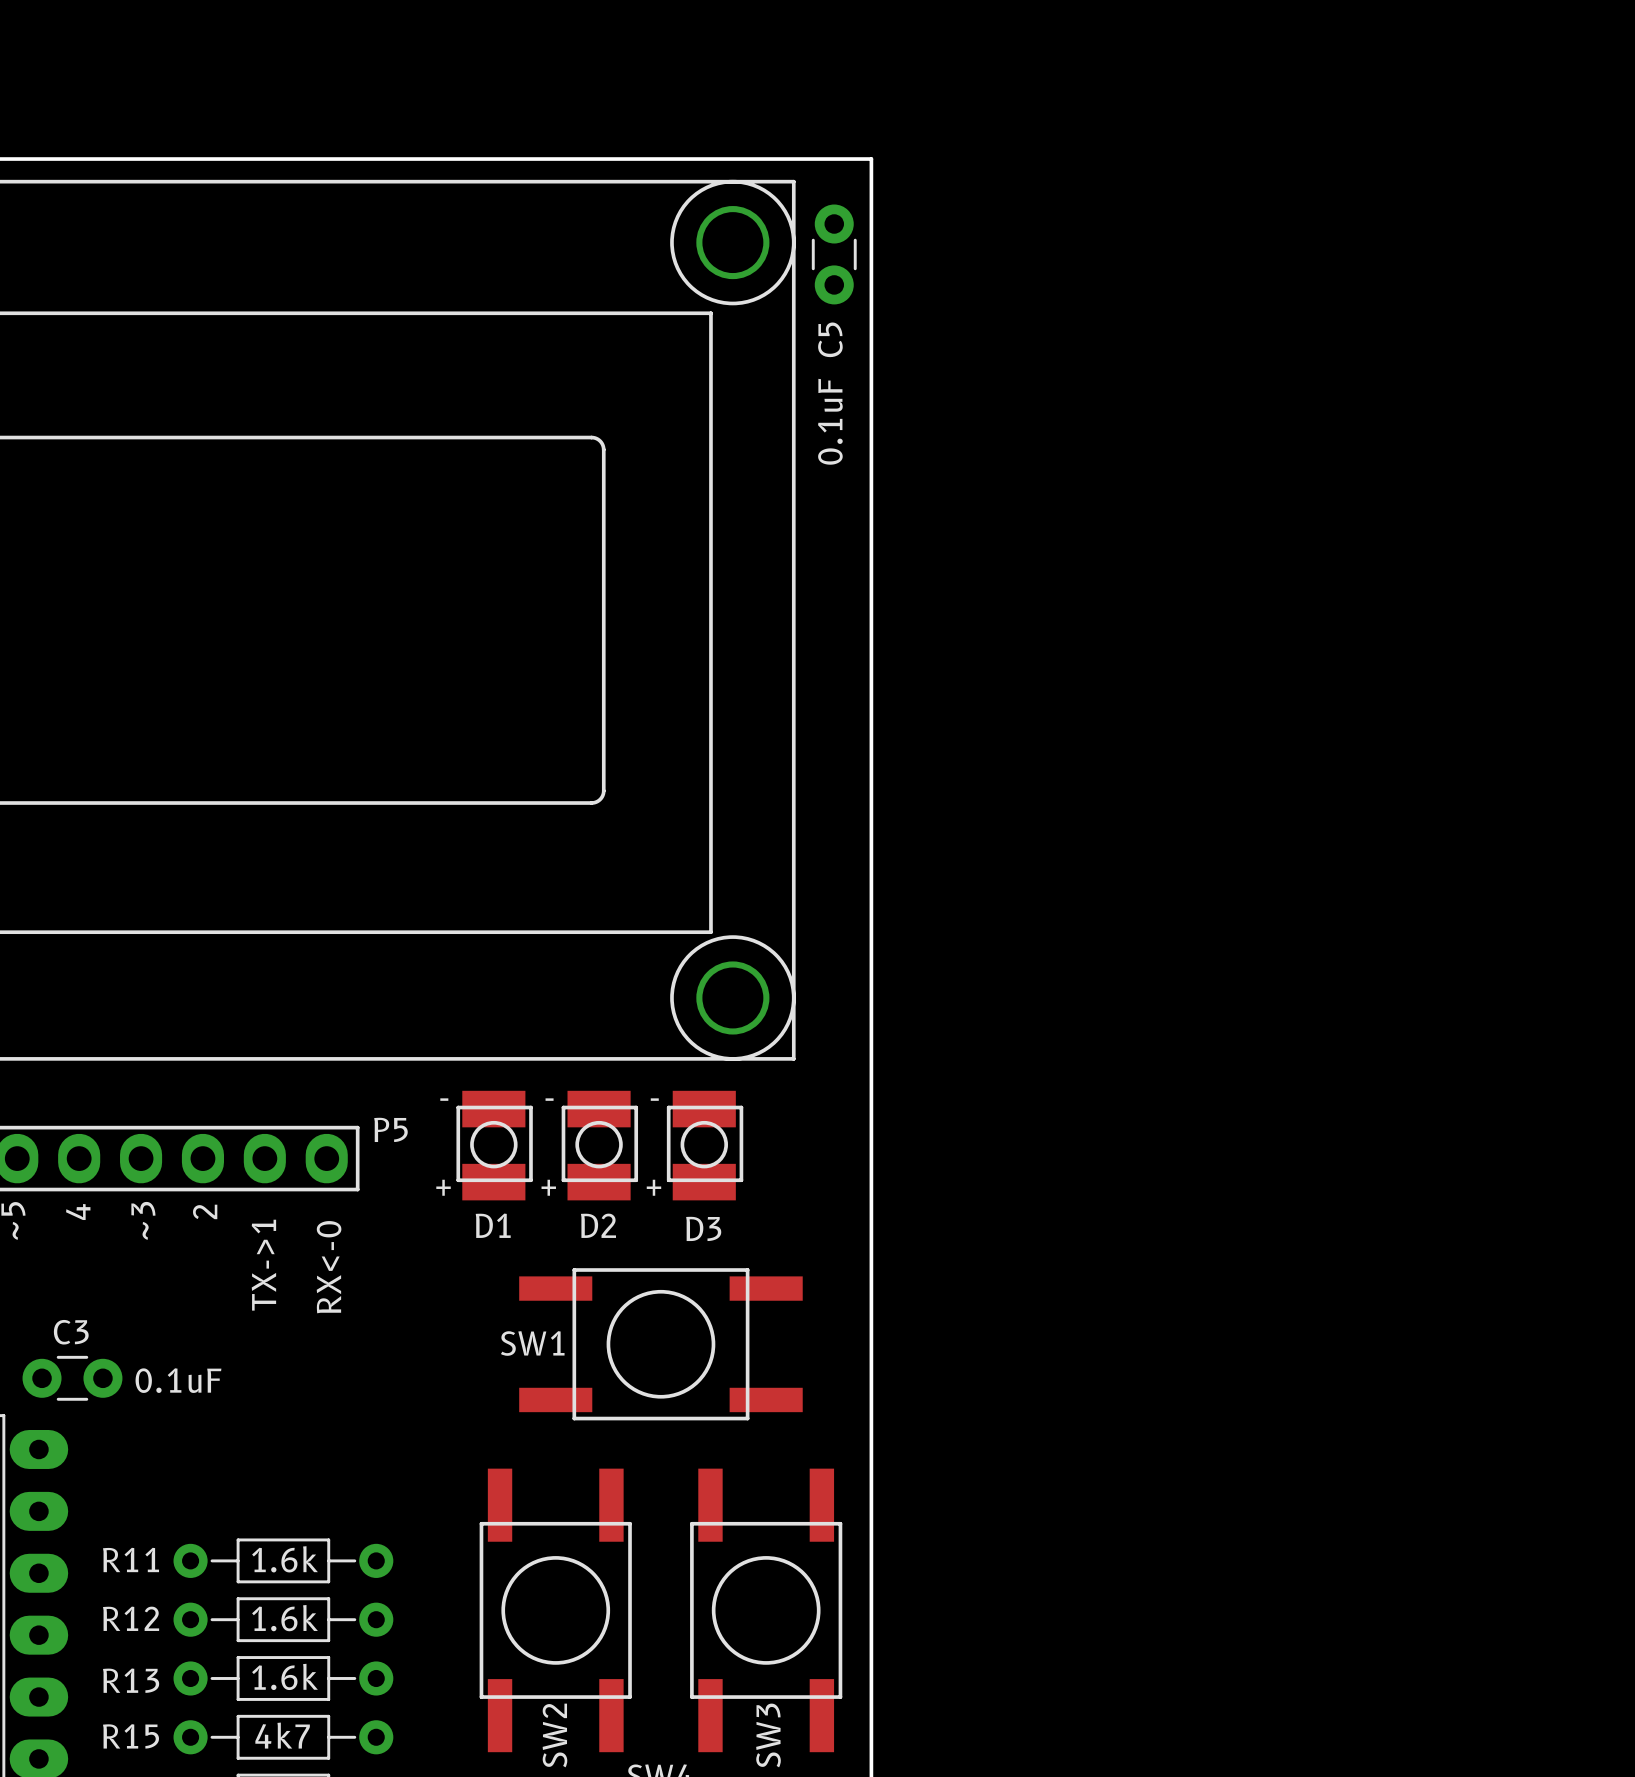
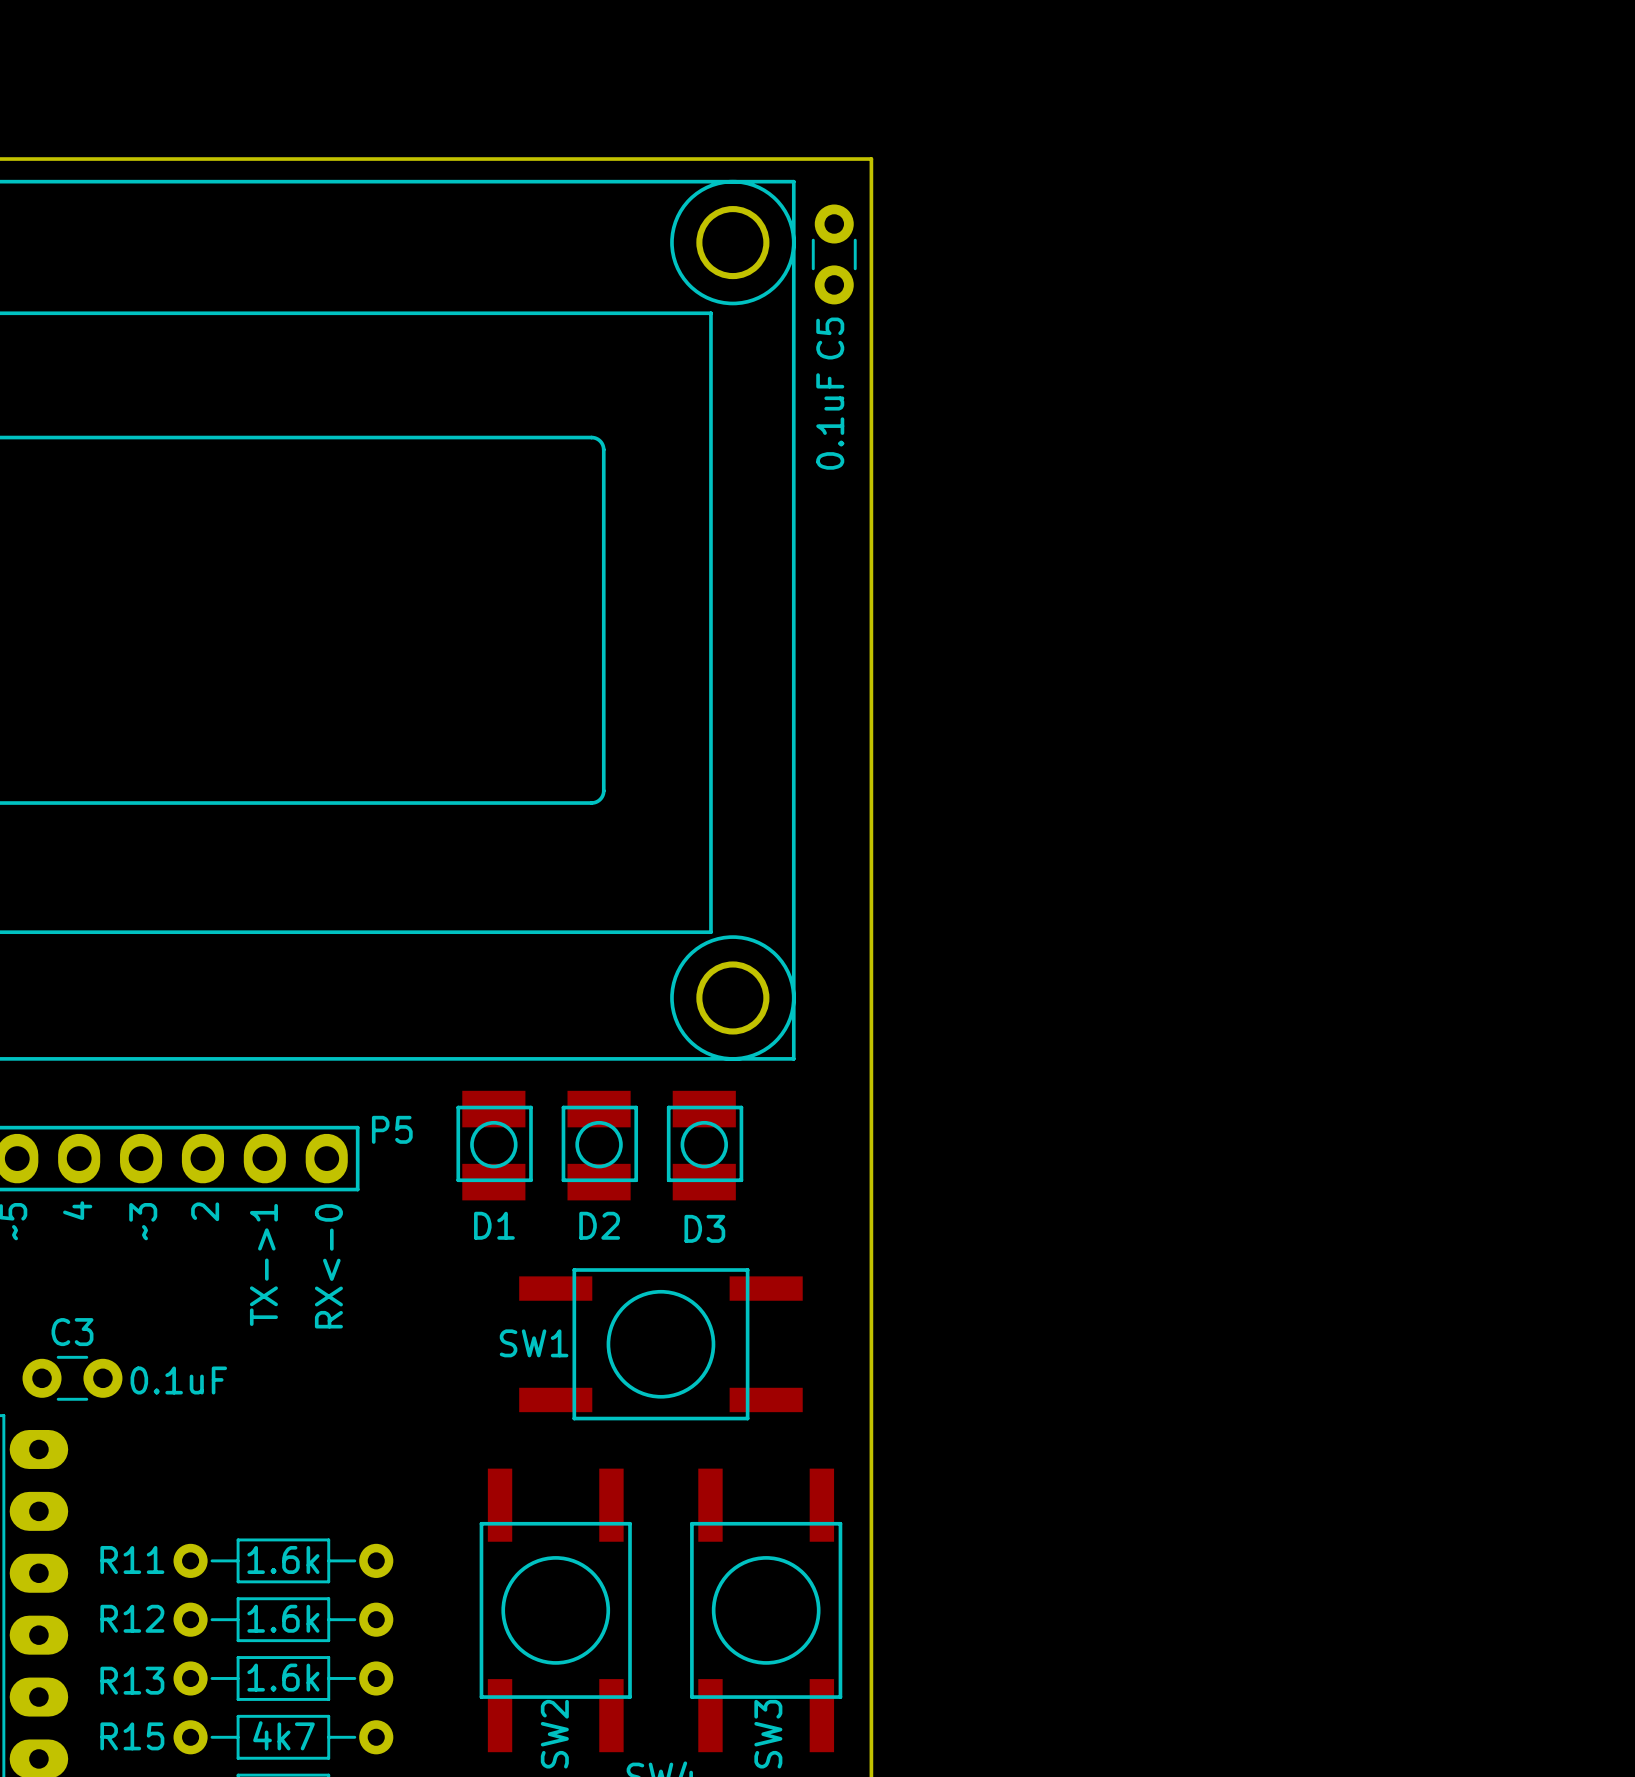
text: - (444, 1099) -> none
text: - (549, 1099) -> none
text: - (654, 1099) -> none
text: + (443, 1187) -> none
text: + (548, 1187) -> none
text: + (653, 1187) -> none

